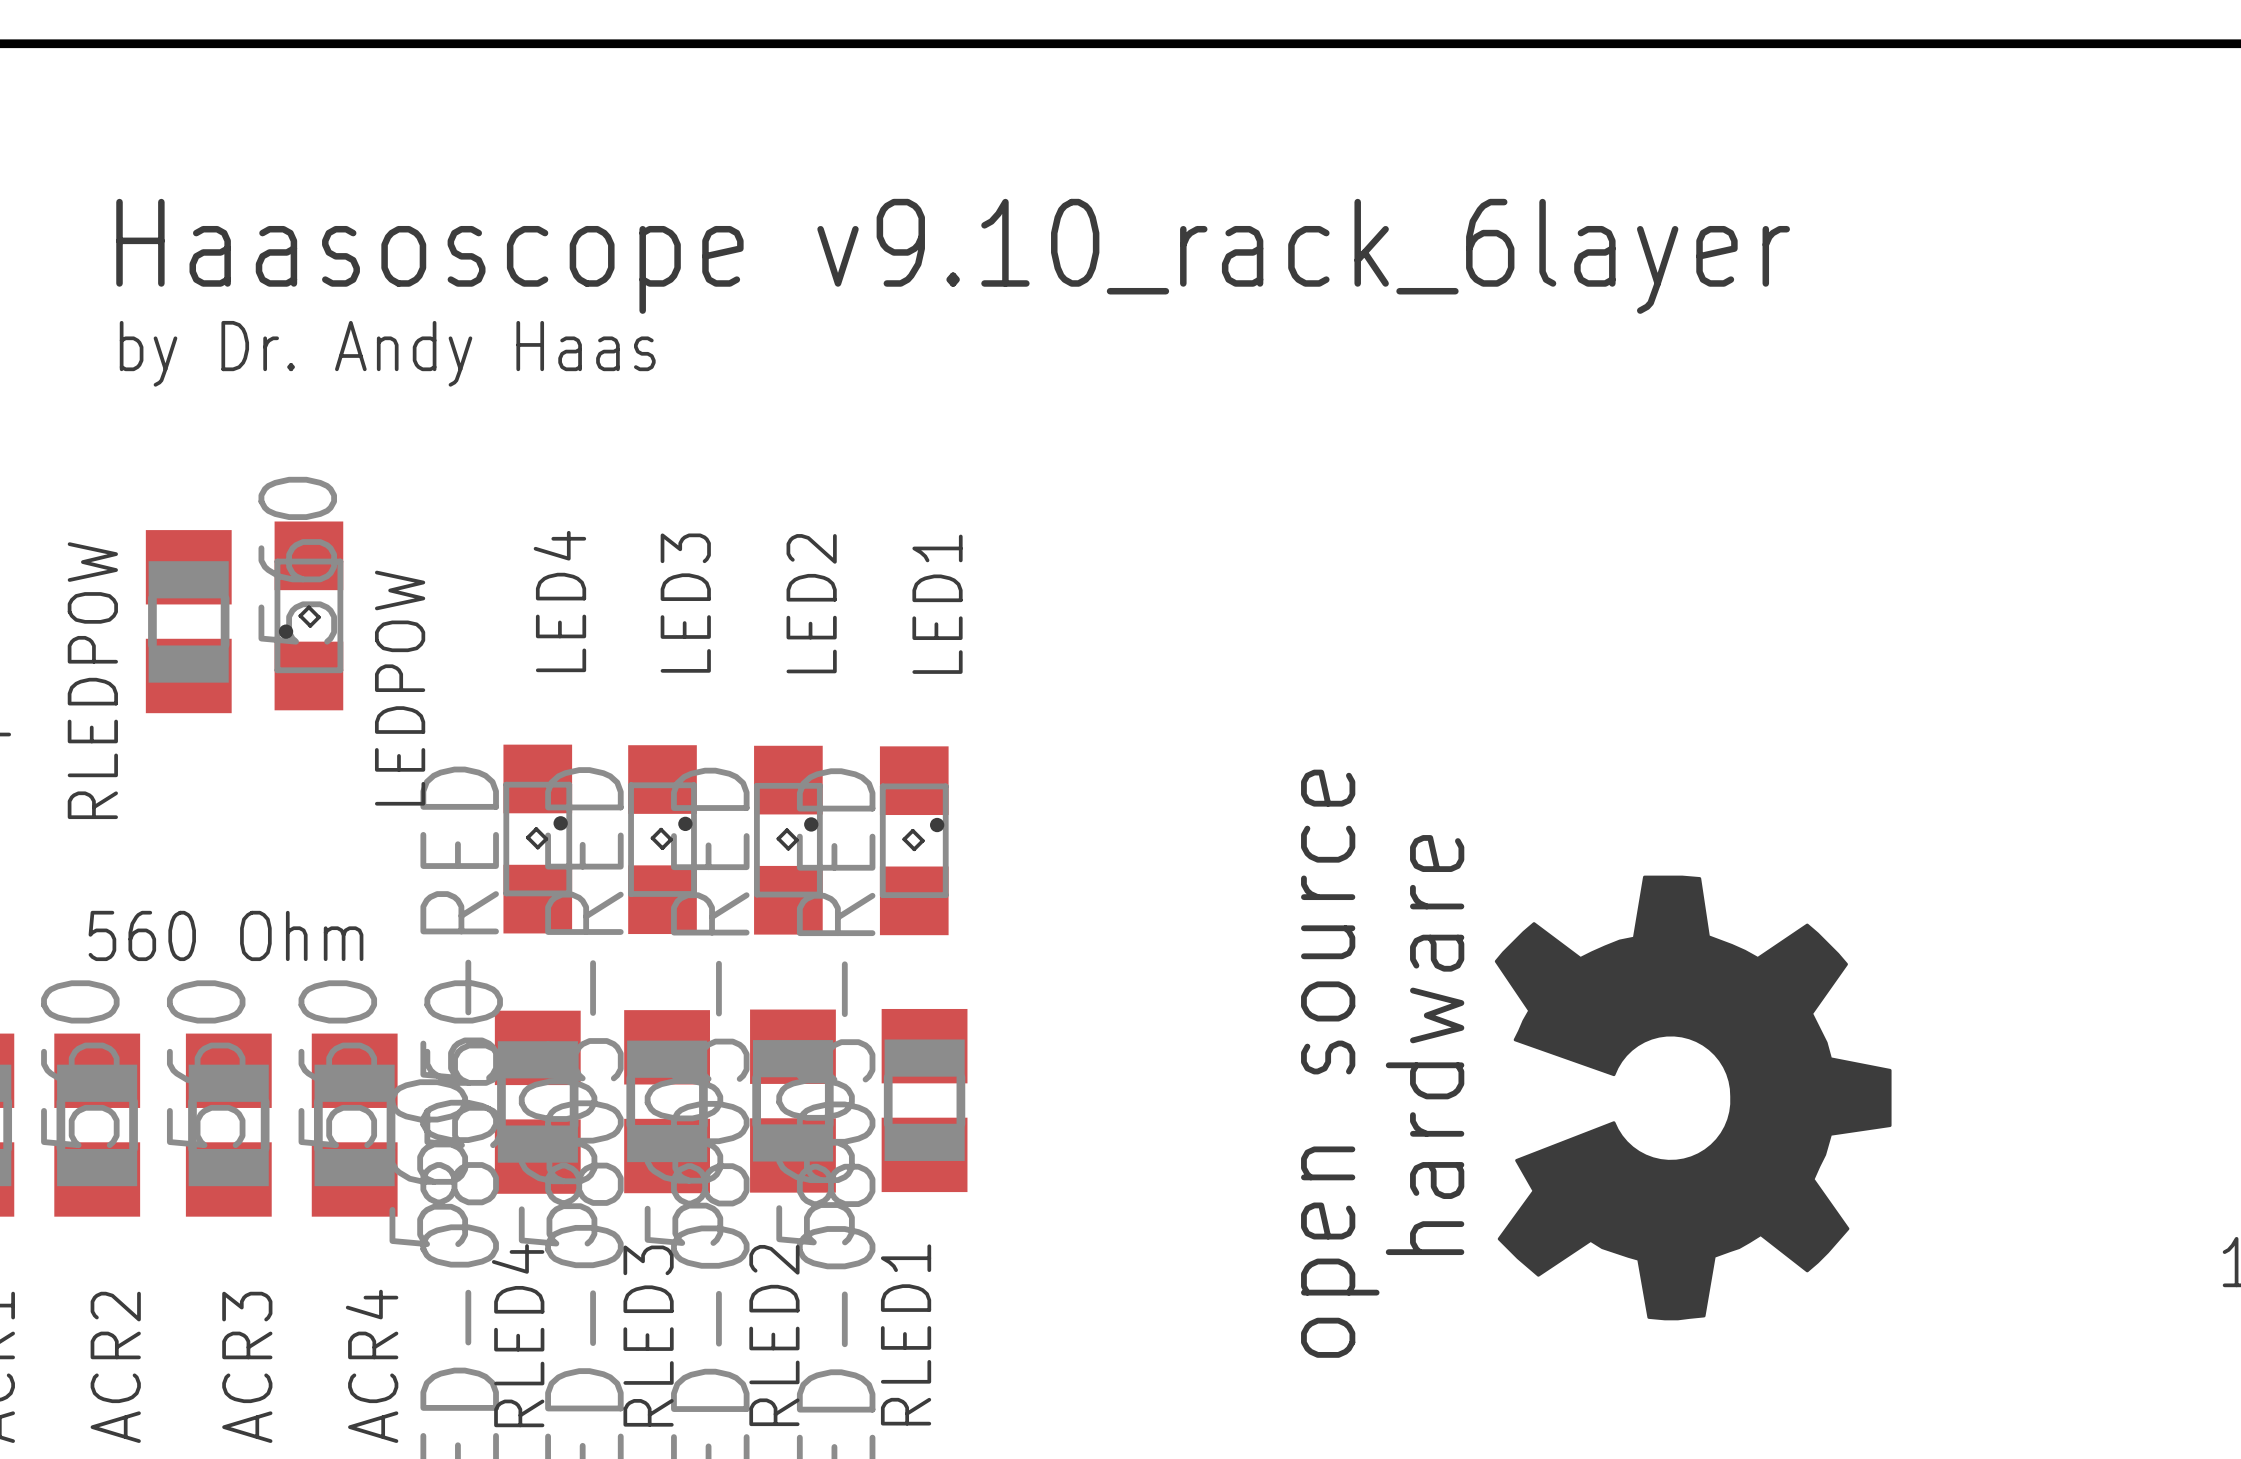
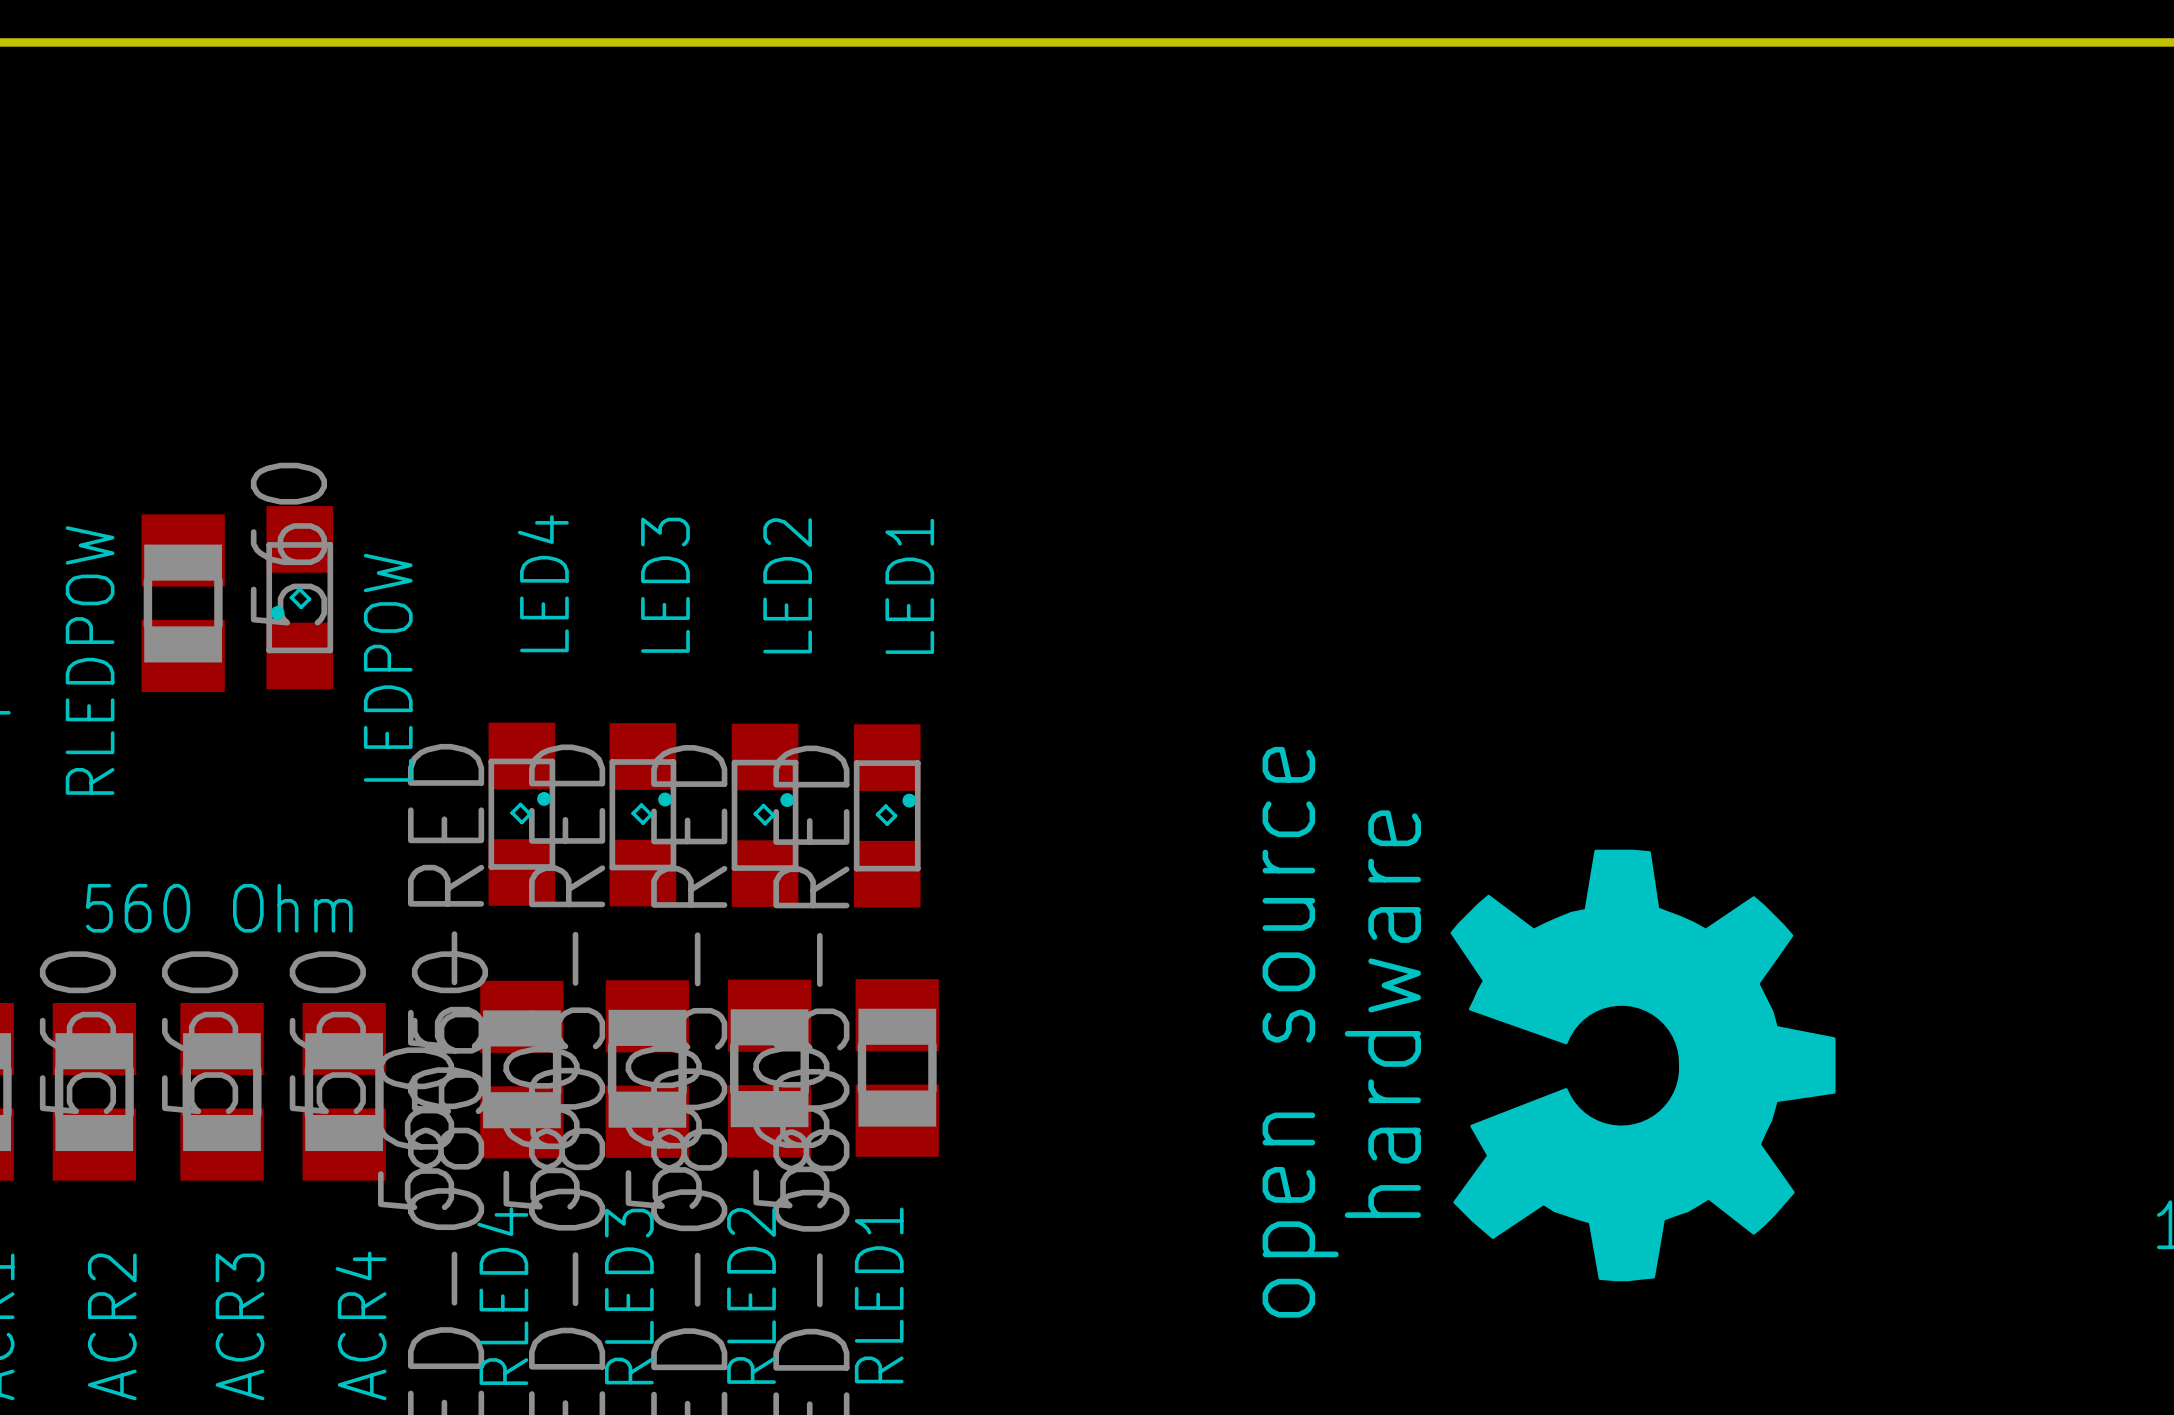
text: Haasoscope v9.10_rack_6layer (953, 256) -> none
text: by Dr. Andy Haas (387, 353) -> none

